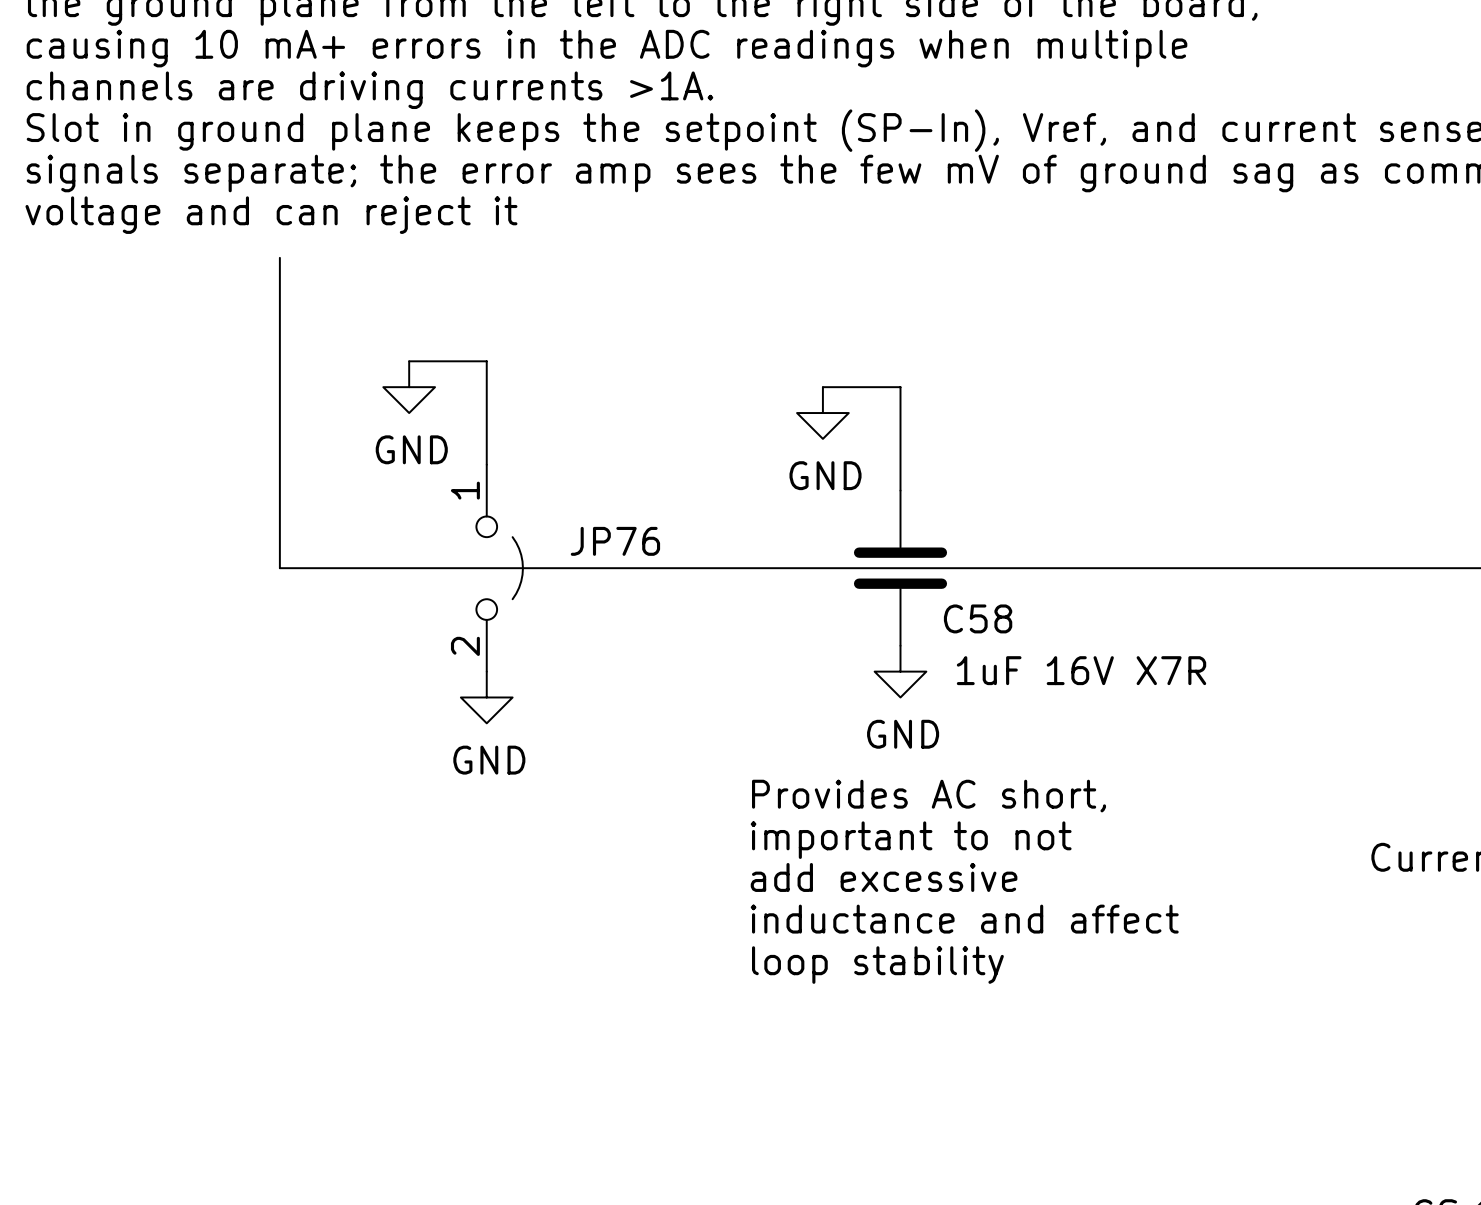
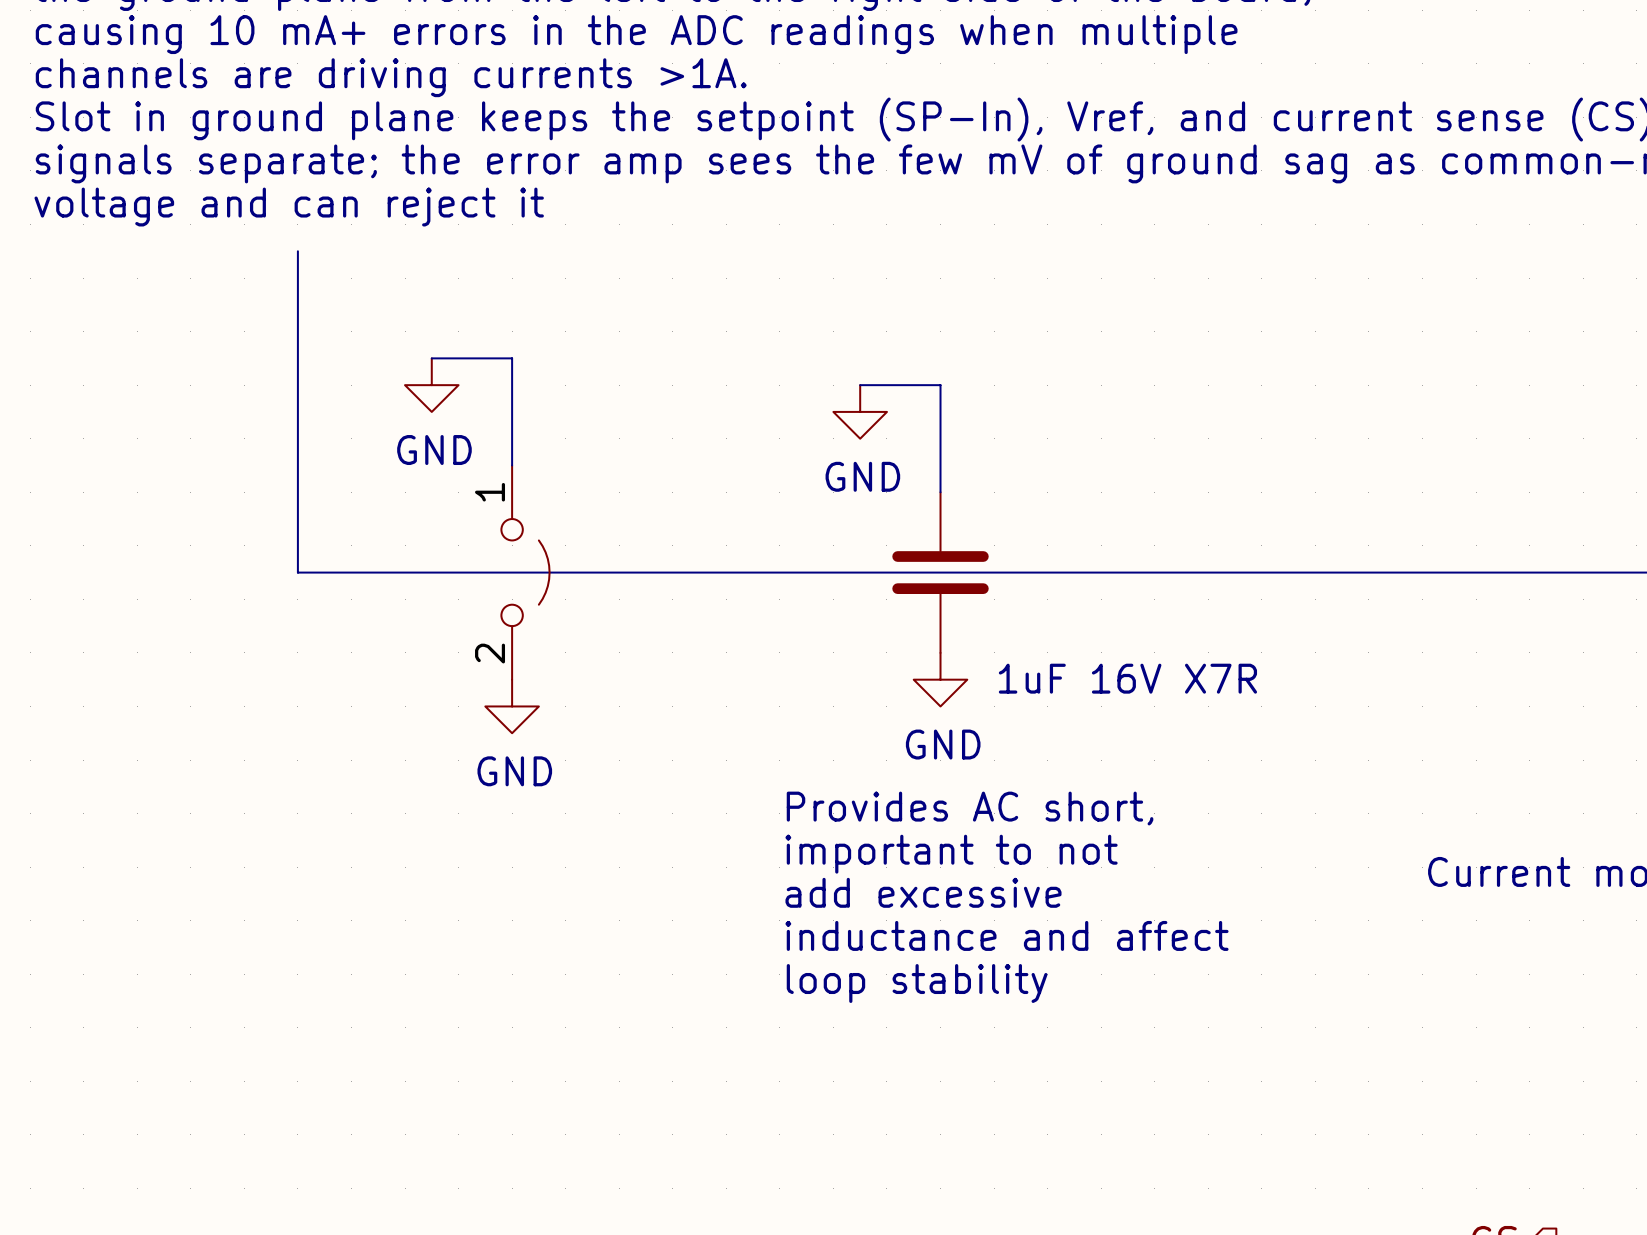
JP76 name: JP76 (615, 541) -> none
C58 name: C58 (978, 618) -> none

